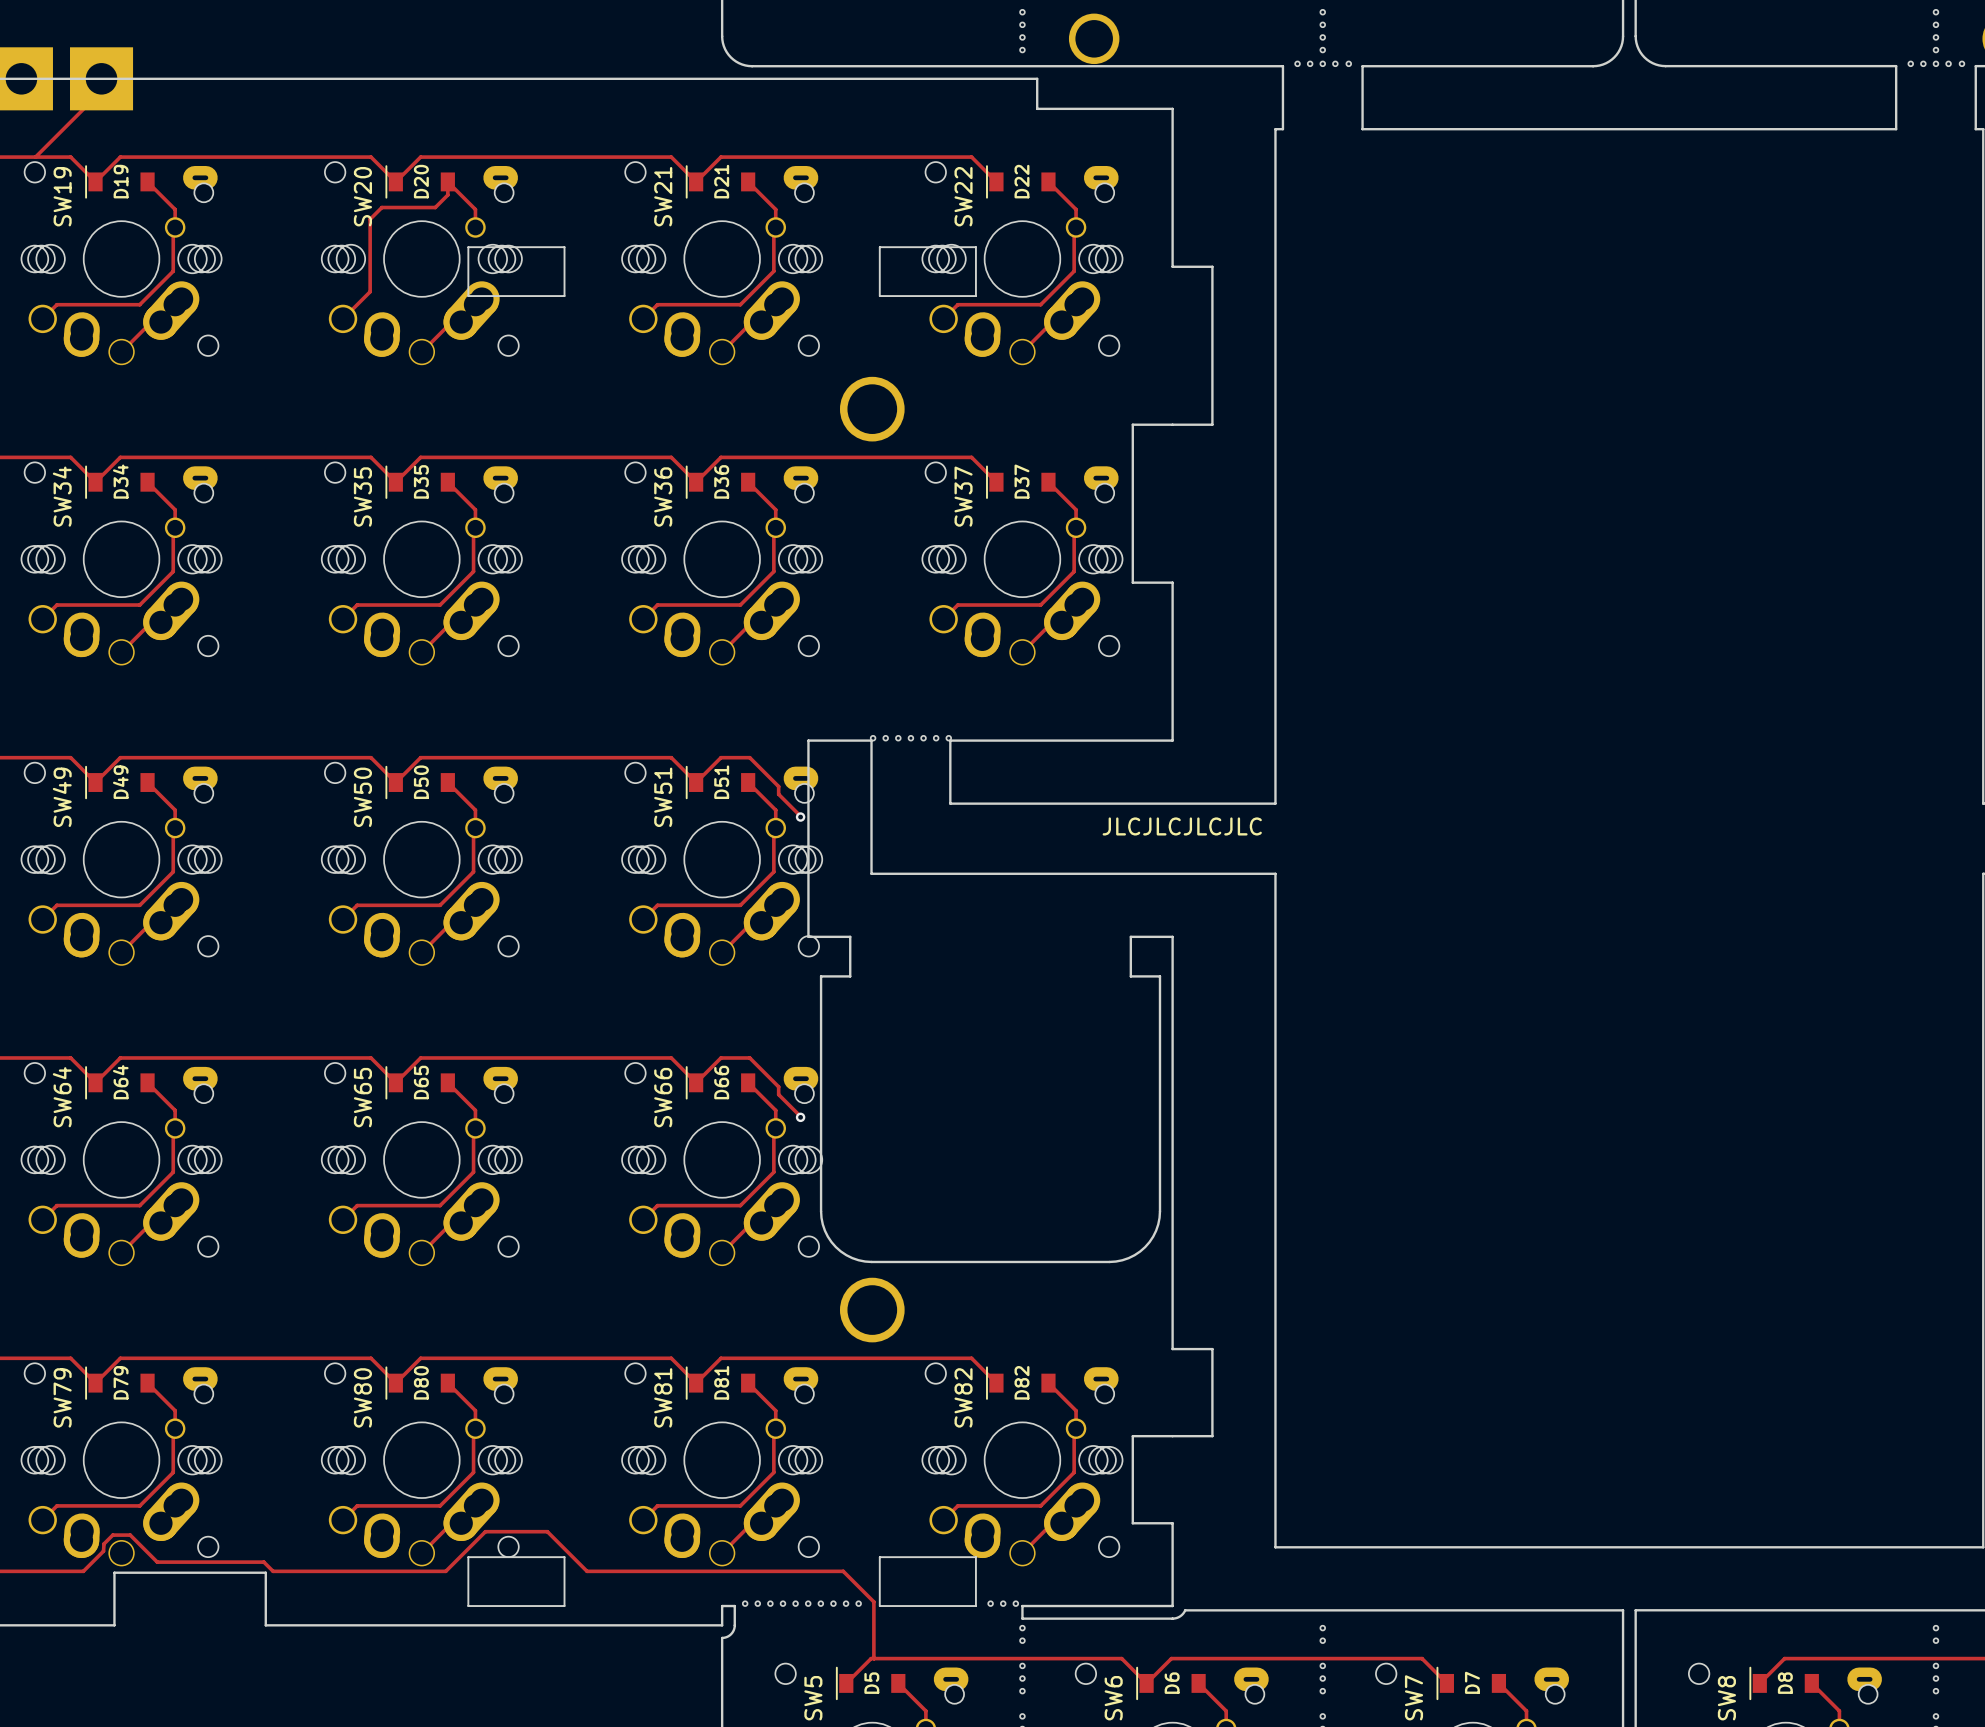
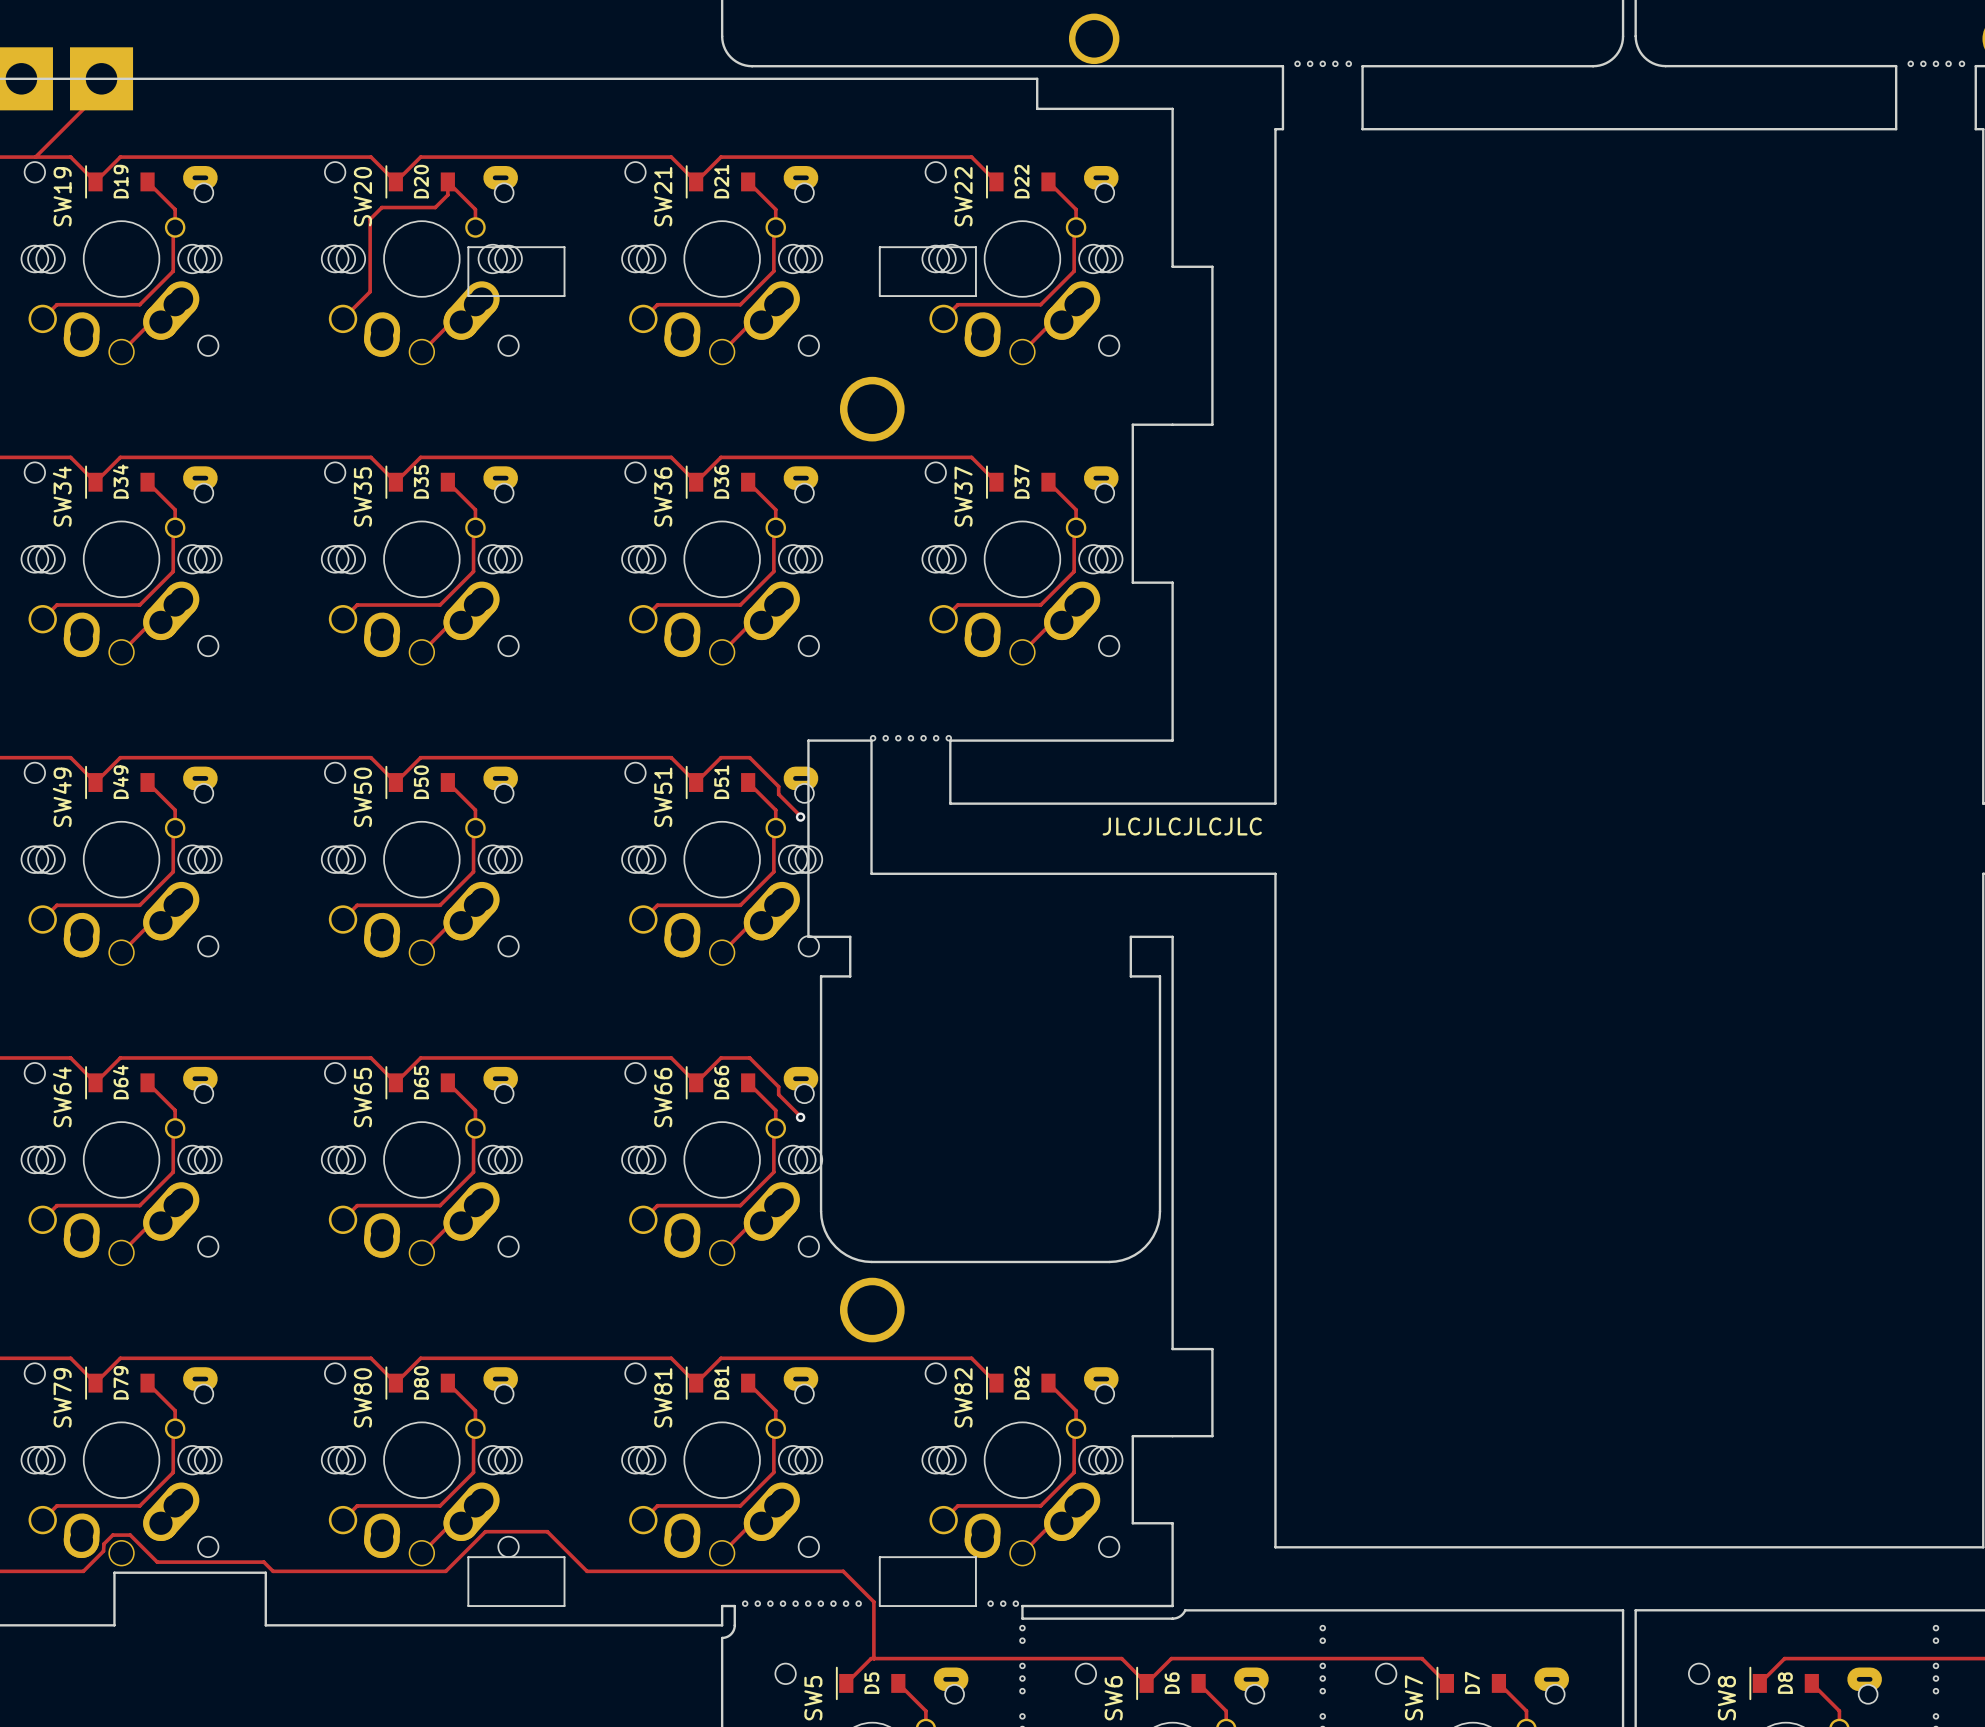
part: (1022, 31) -> none
part: (1322, 31) -> none
part: (1935, 31) -> none

